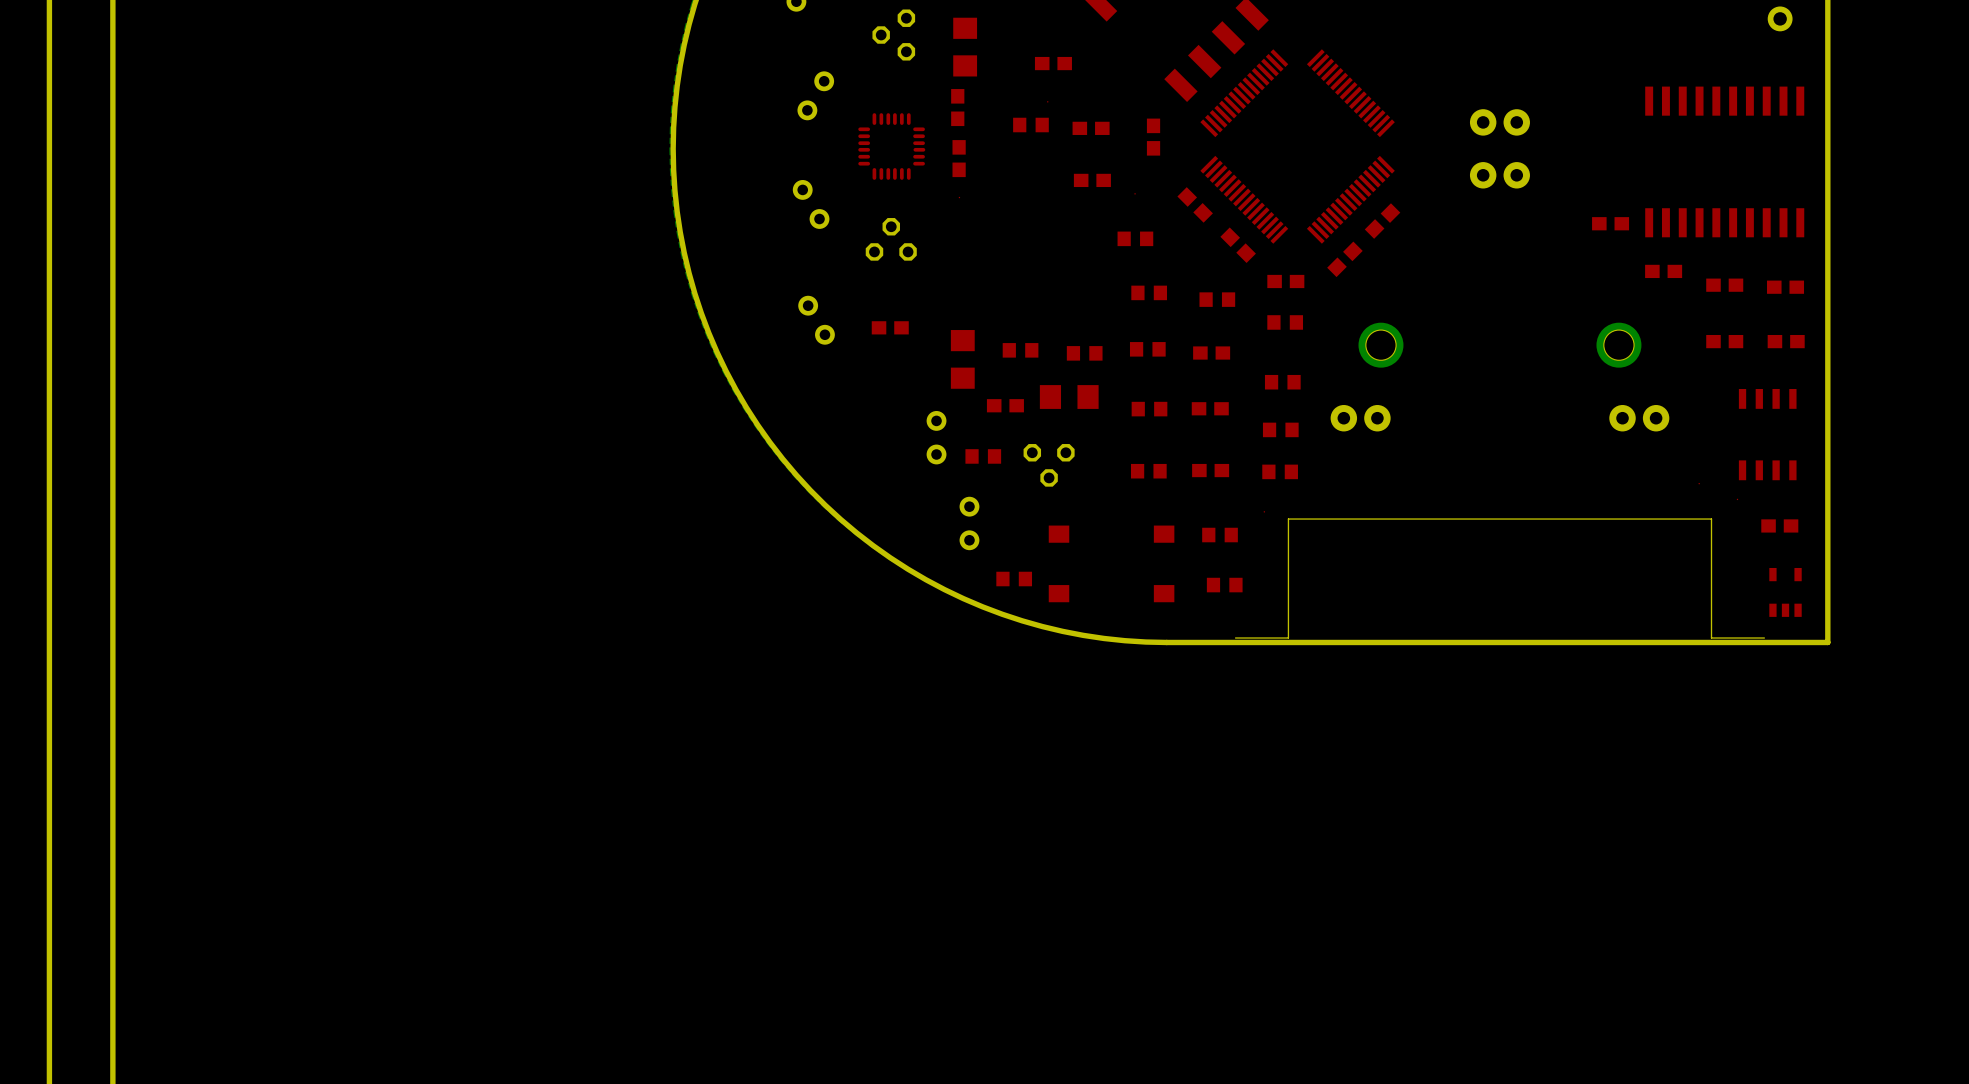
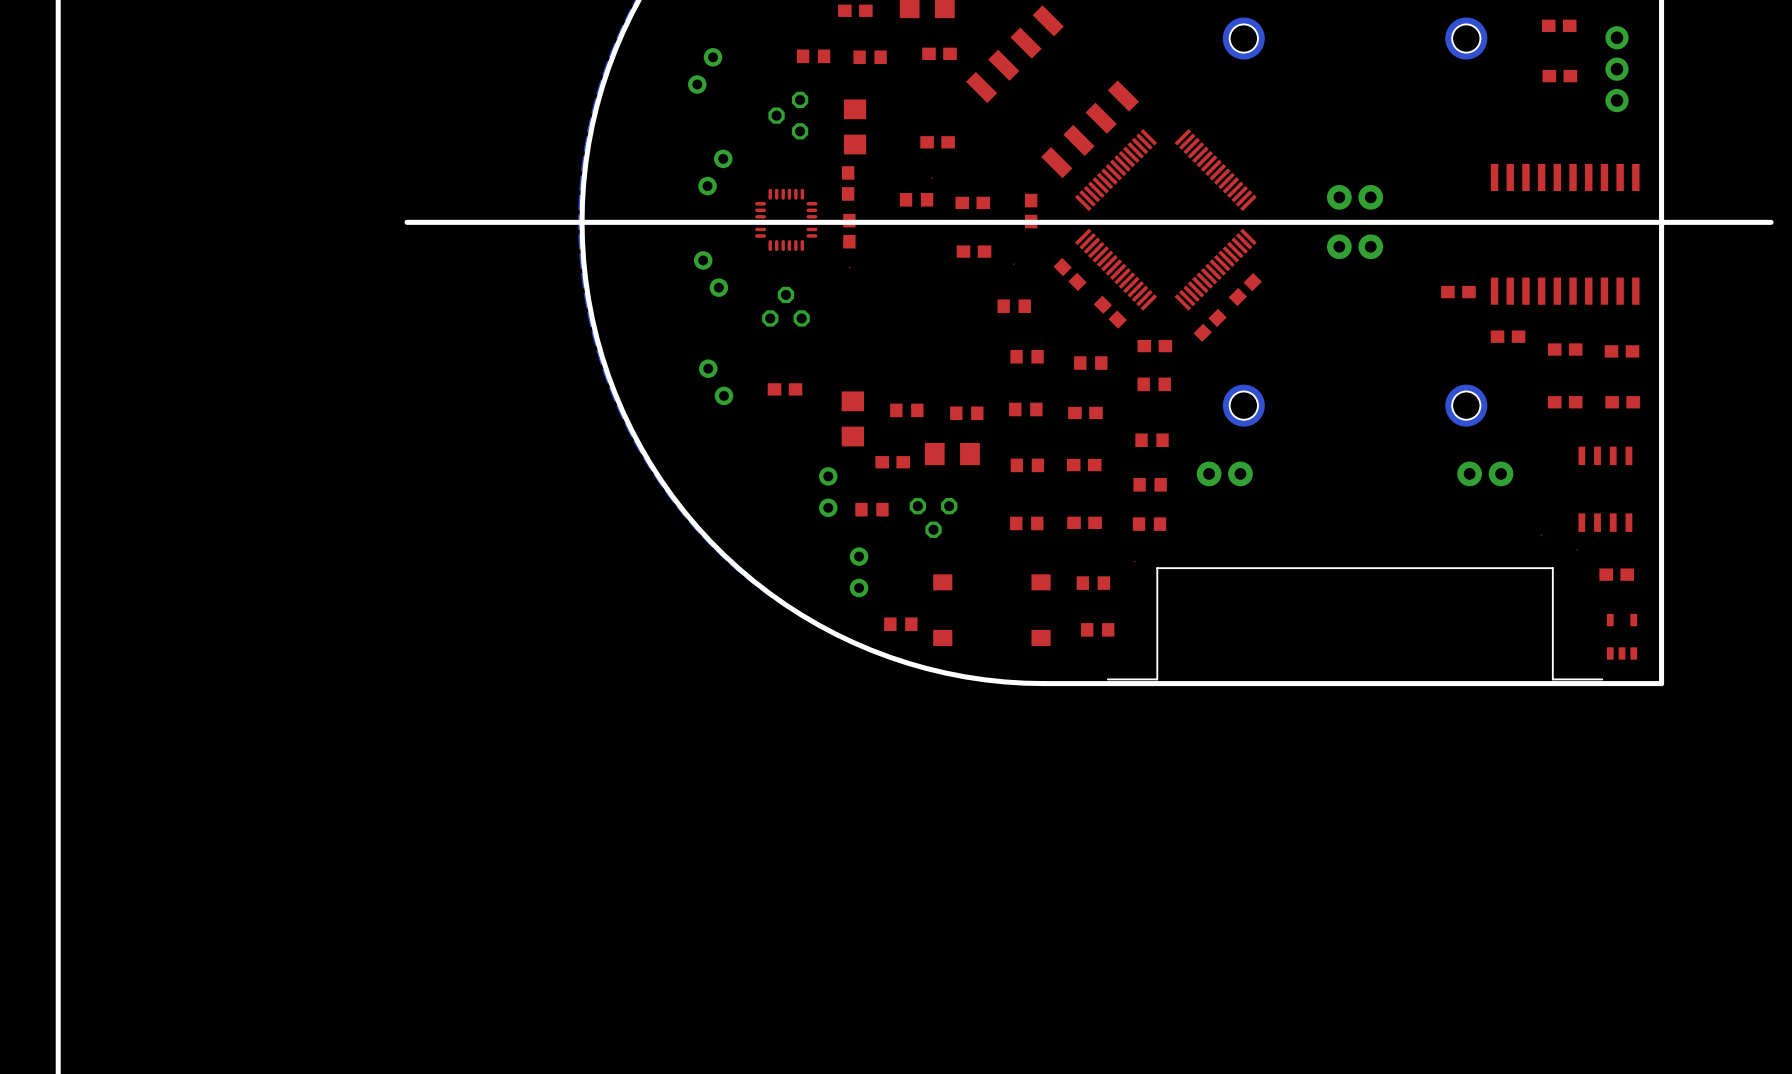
board edge: none -> (1771, 222) (406, 222)

